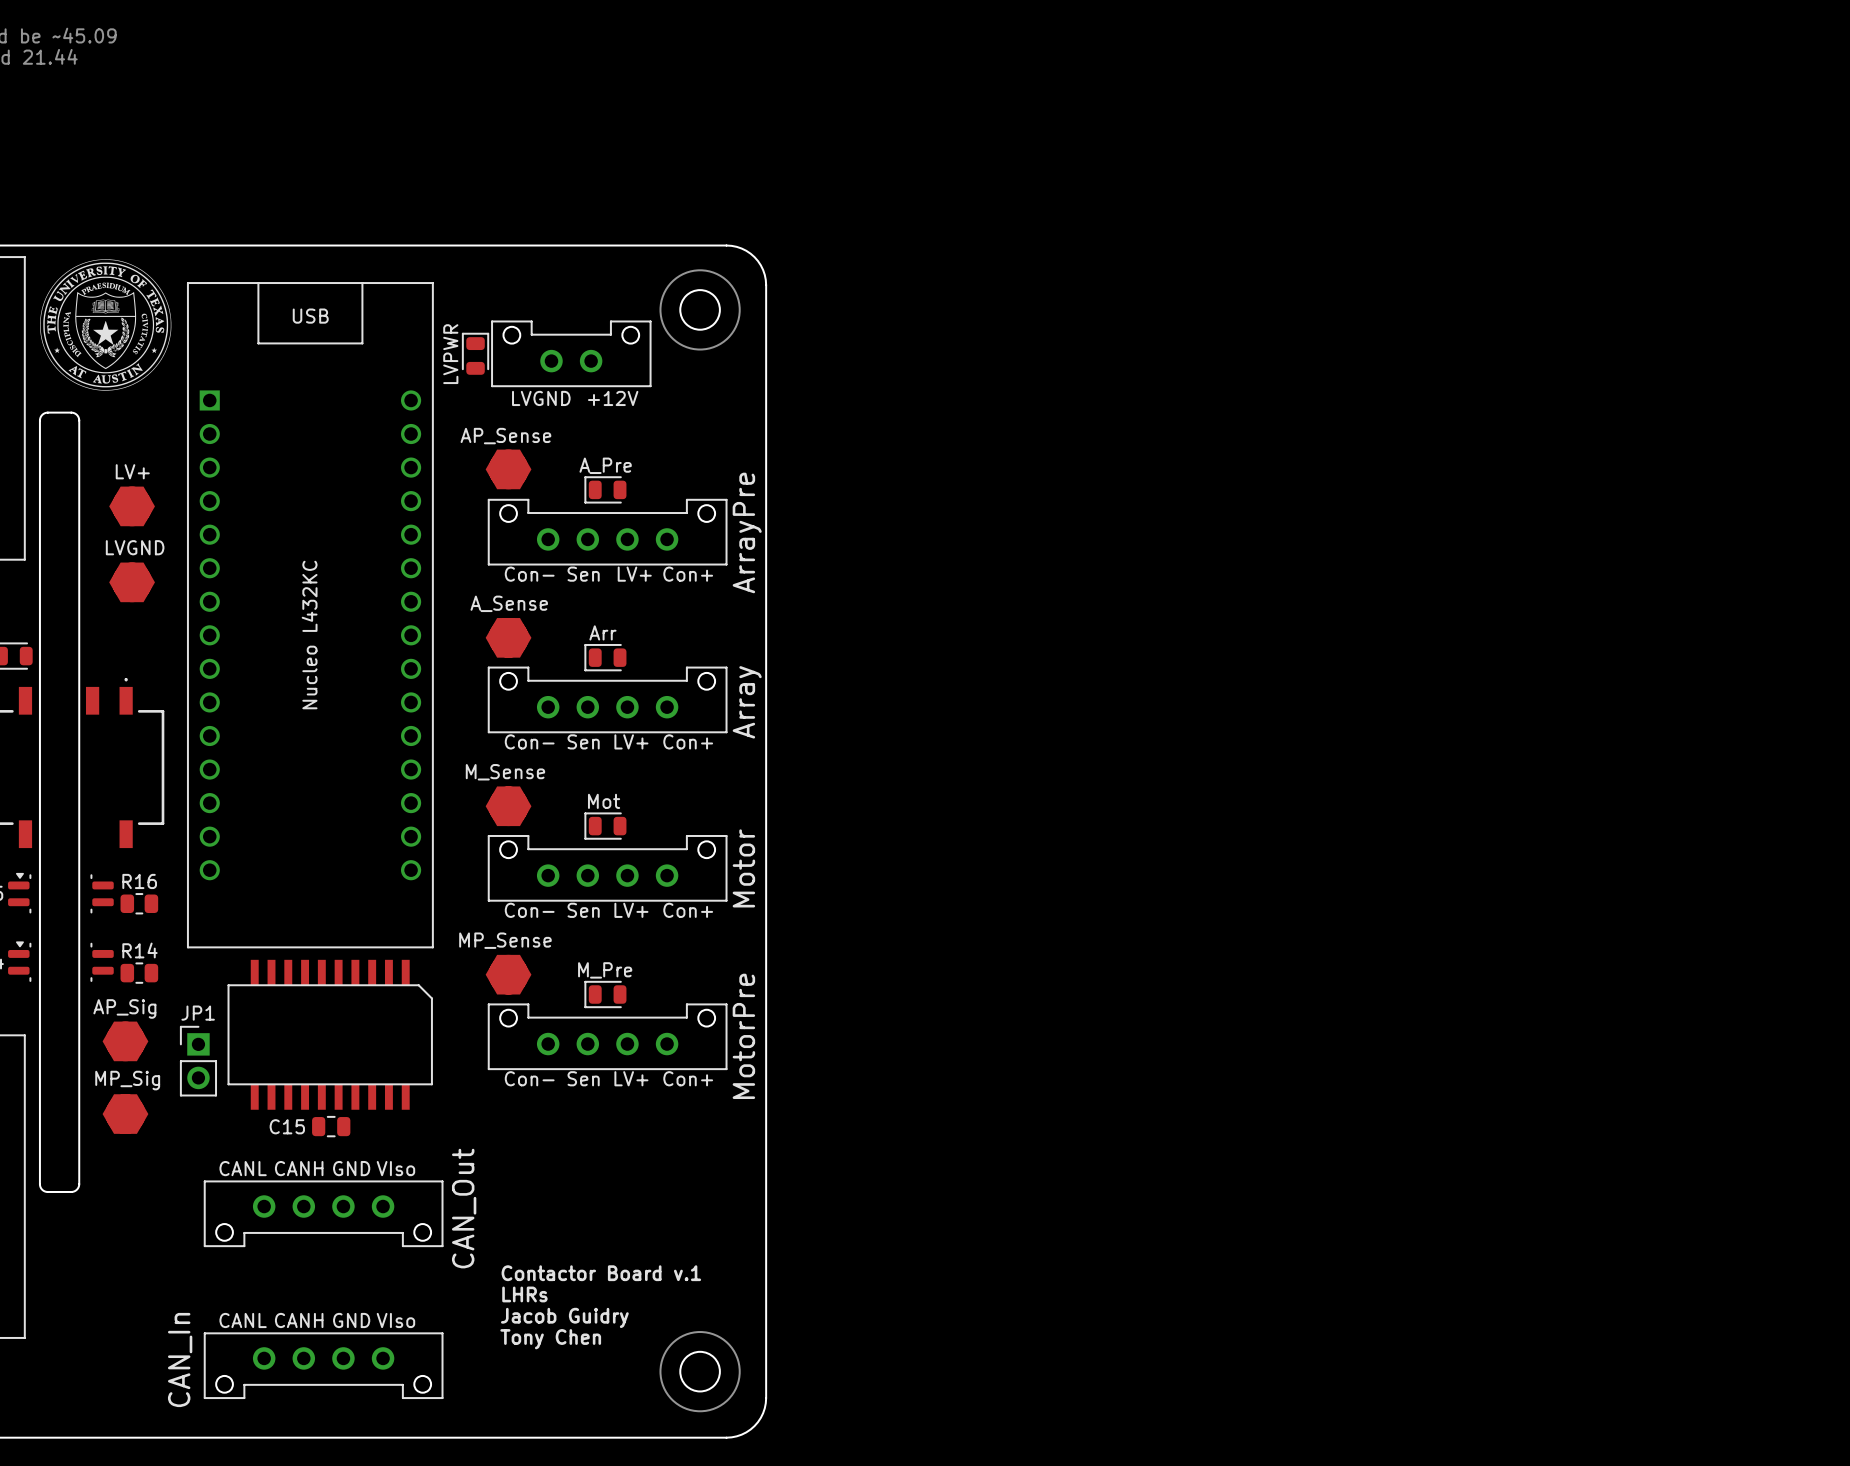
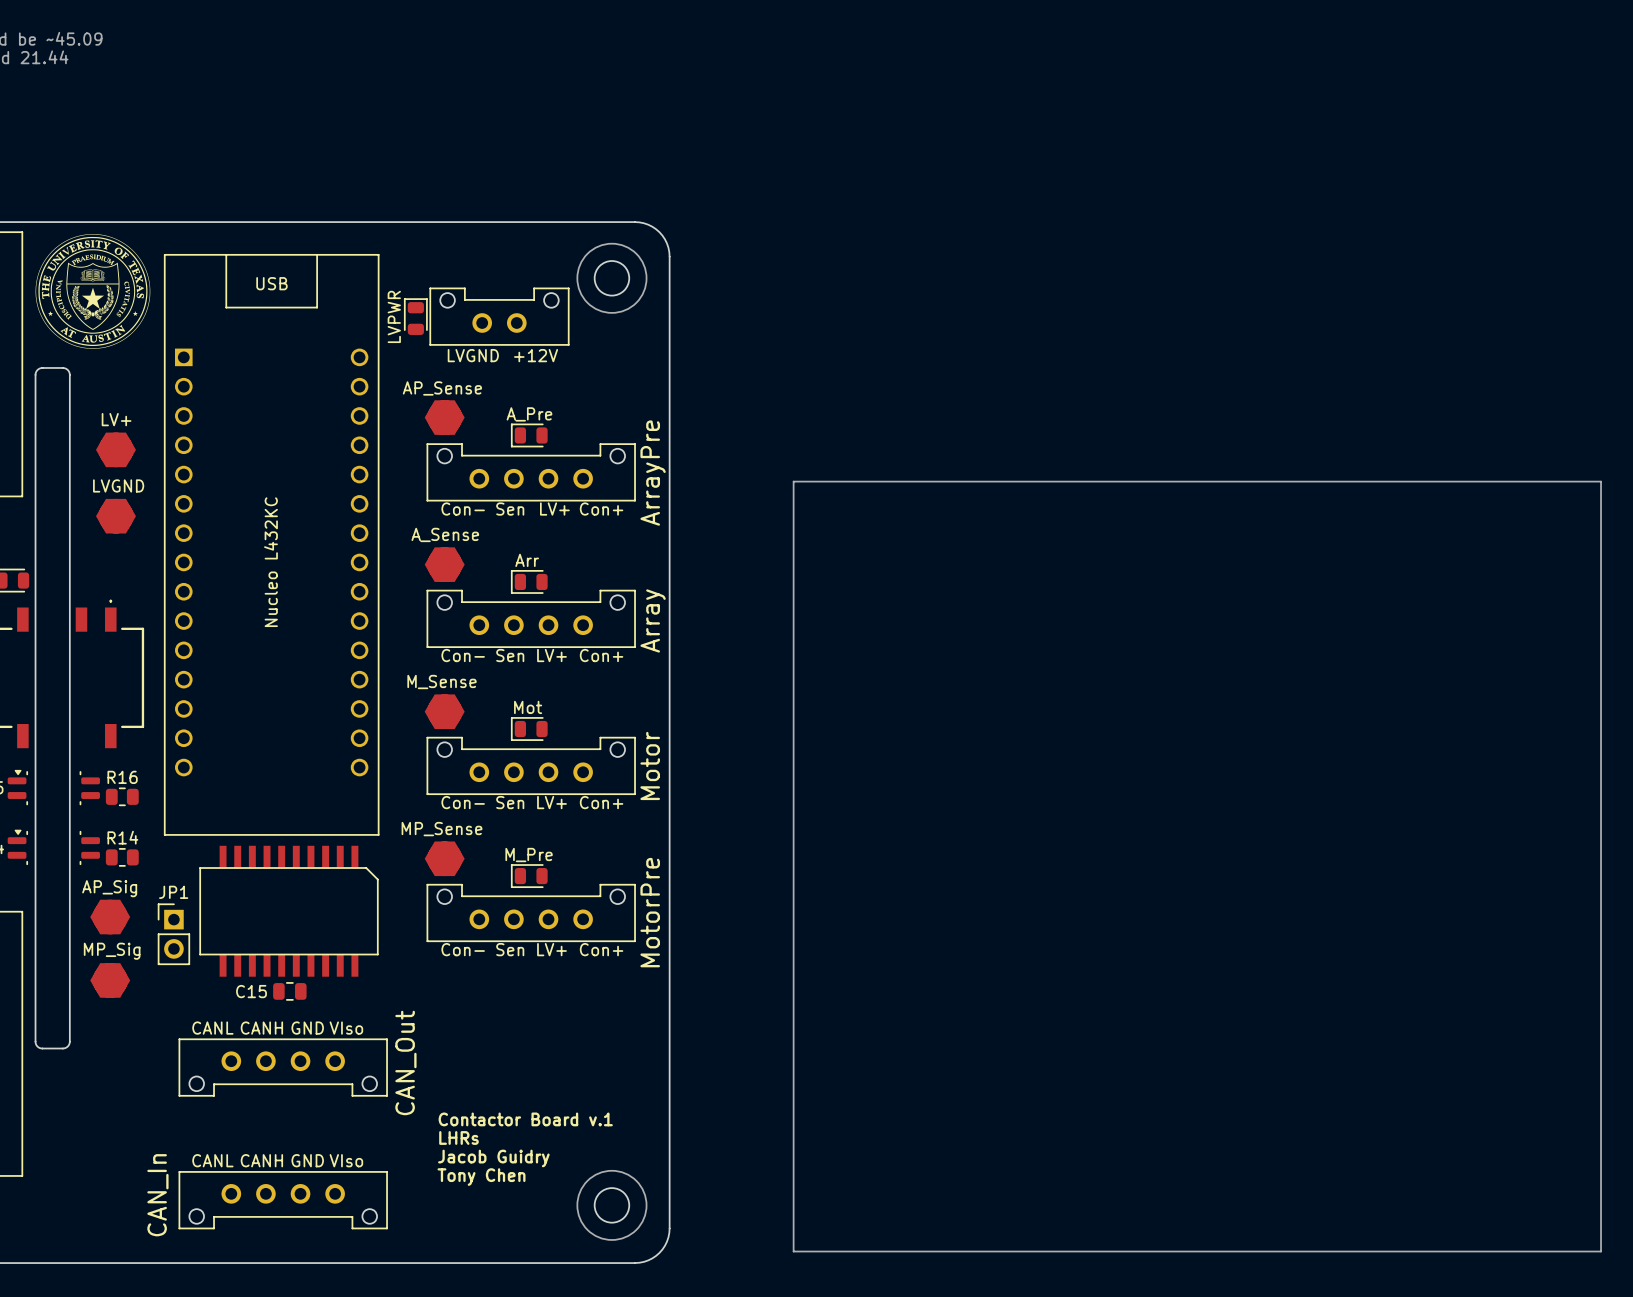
line: none -> (793, 481) (1601, 481) (1601, 1251) (793, 1251) (793, 481)

